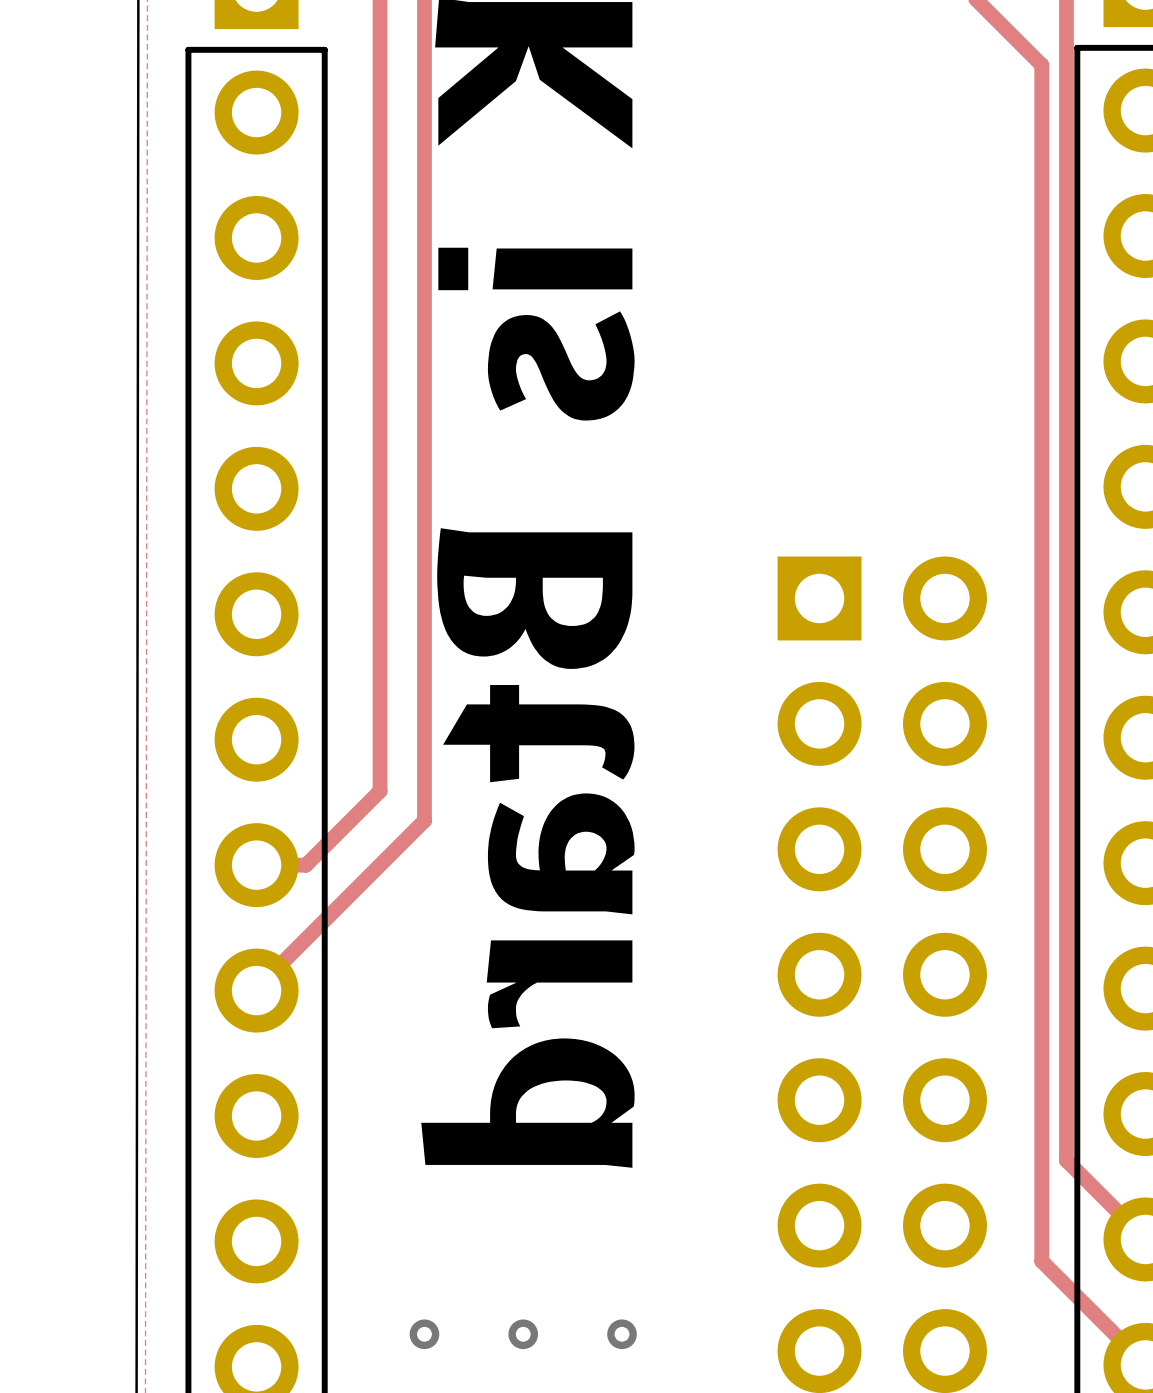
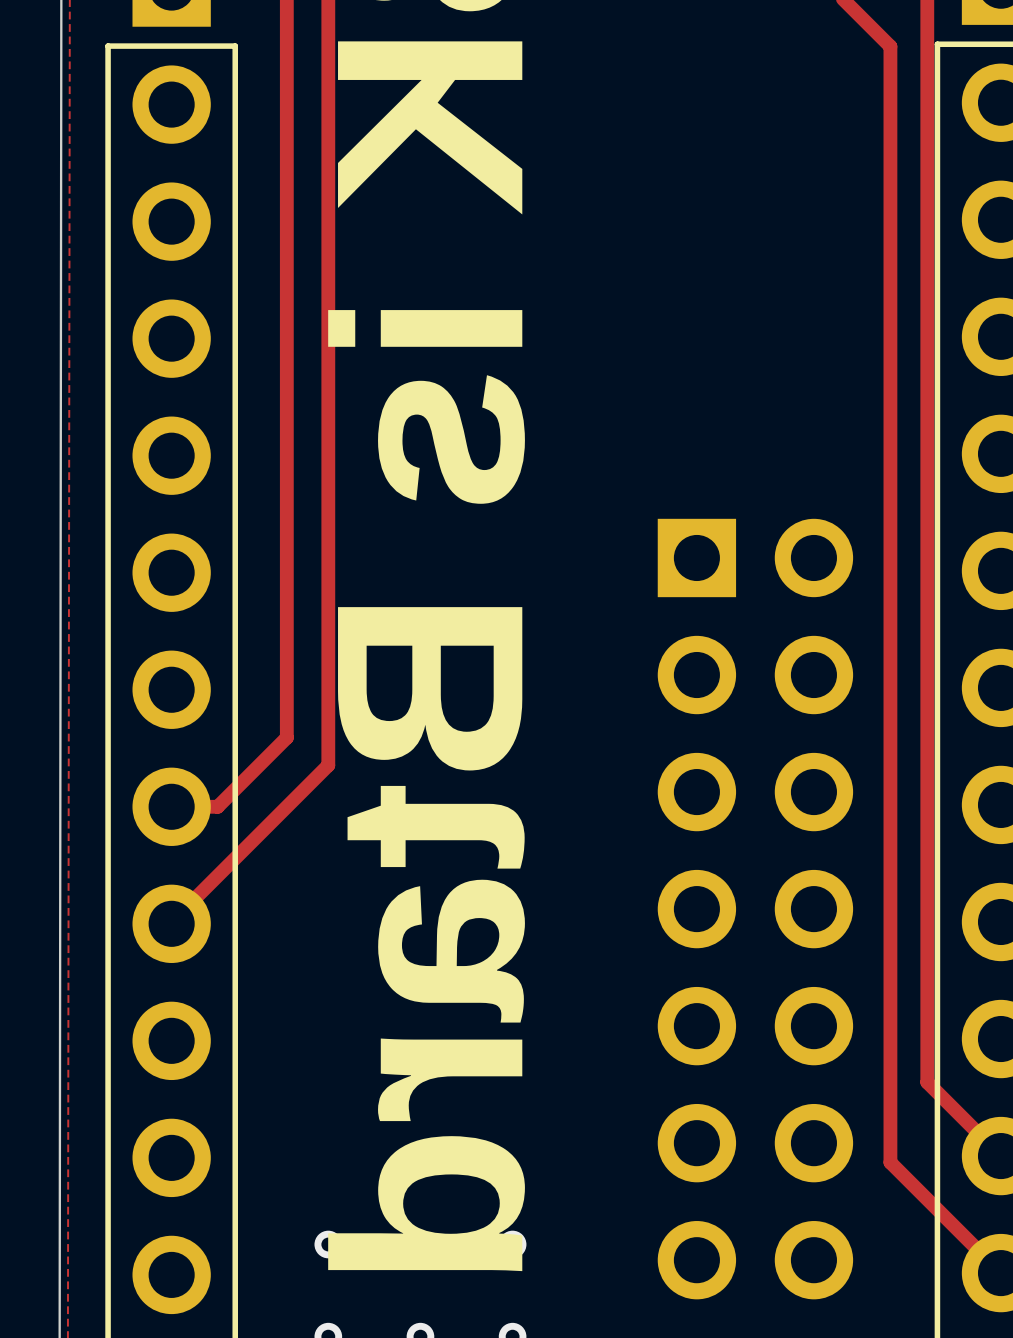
track: (1026, 50) (1041, 65) (1041, 1261) -> (890, 46) (890, 1162) (904, 1176)

